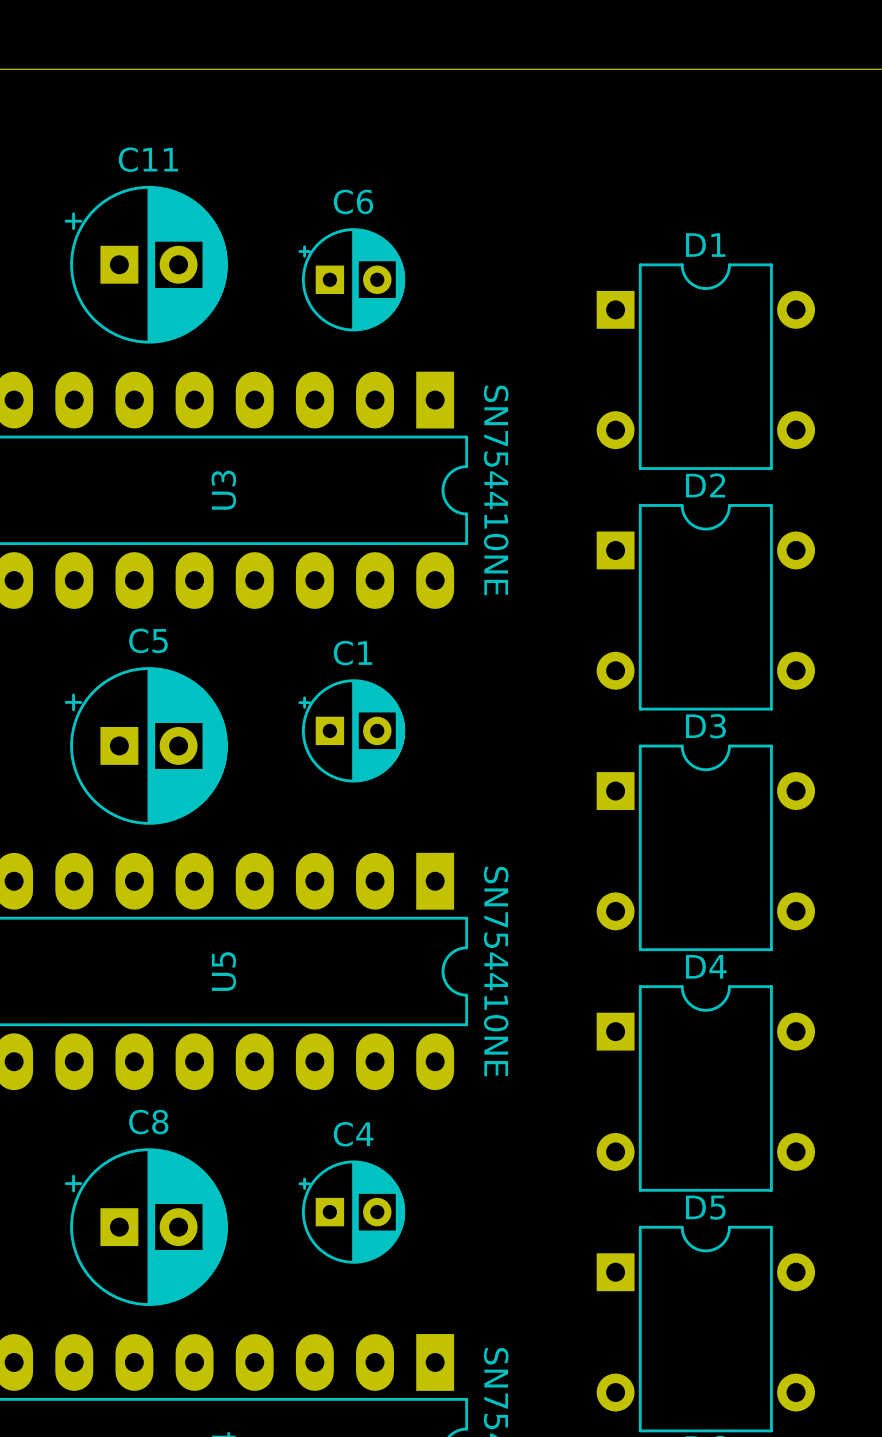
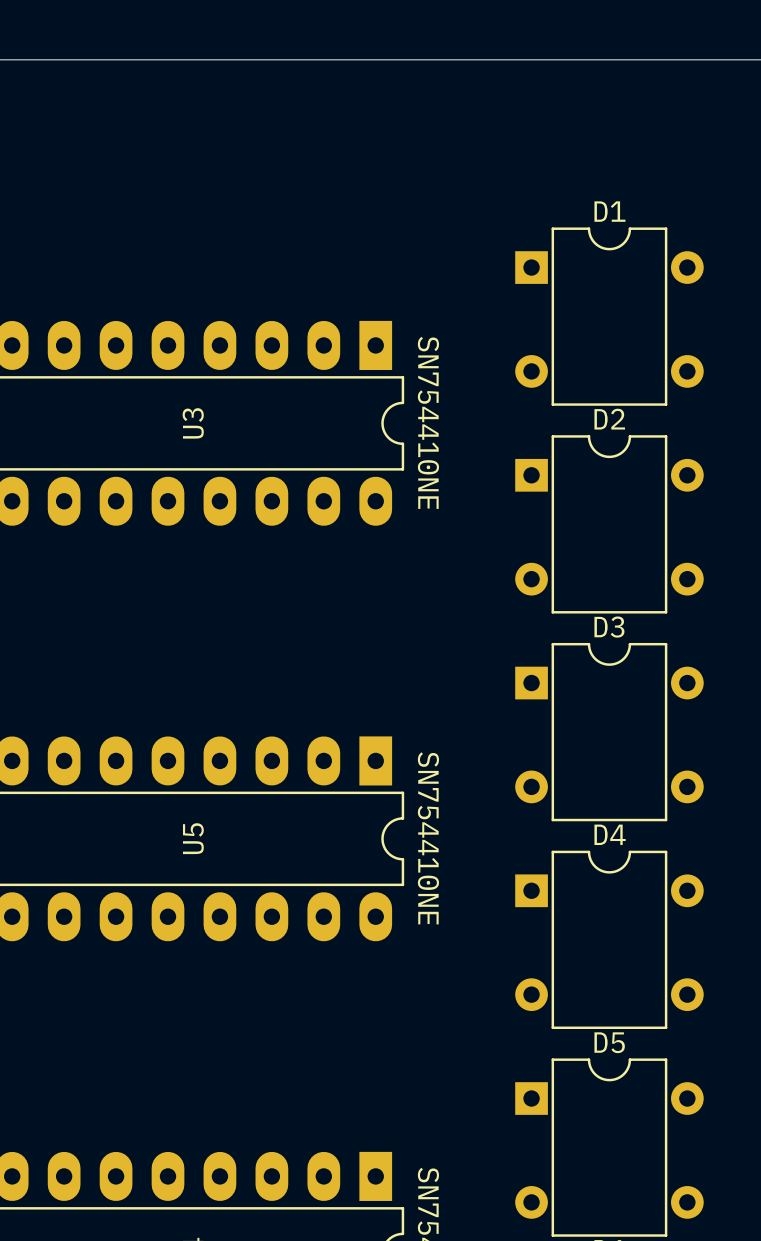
C11: (146, 264) -> none
C6: (351, 279) -> none
C1: (351, 730) -> none
C5: (146, 745) -> none
C4: (351, 1212) -> none
C8: (146, 1227) -> none

